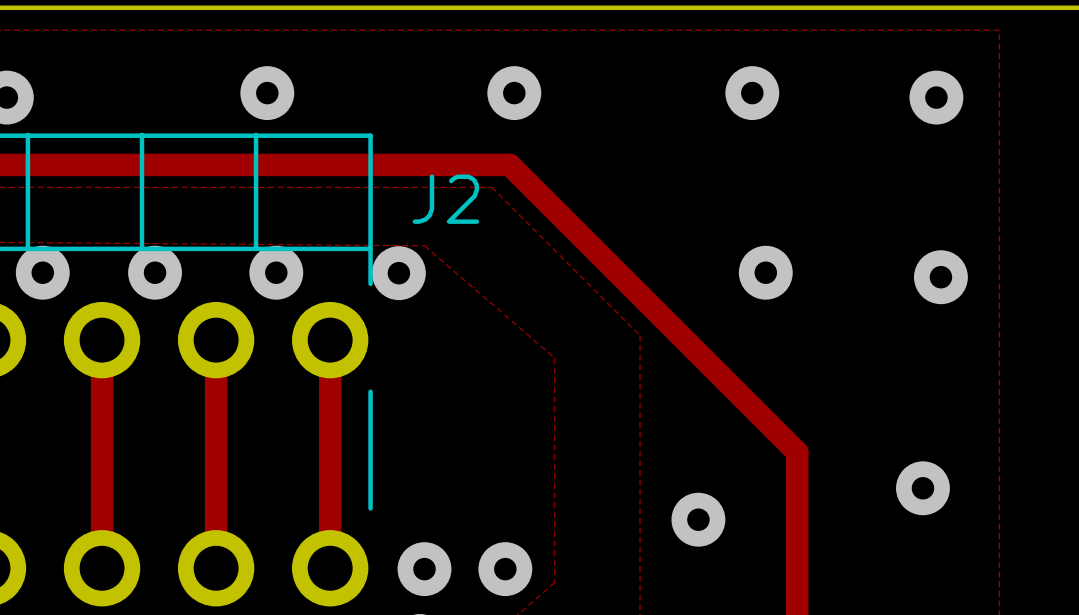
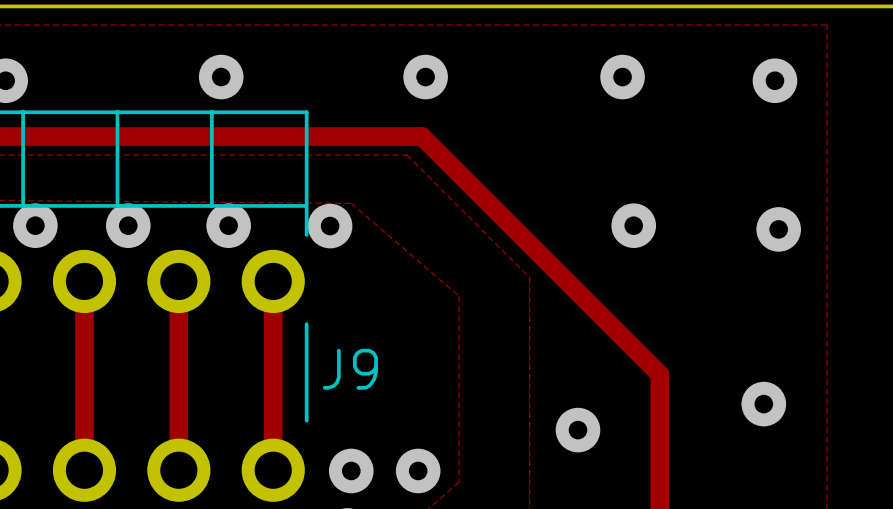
J2 name: J2 (445, 199) -> J9 (350, 369)

